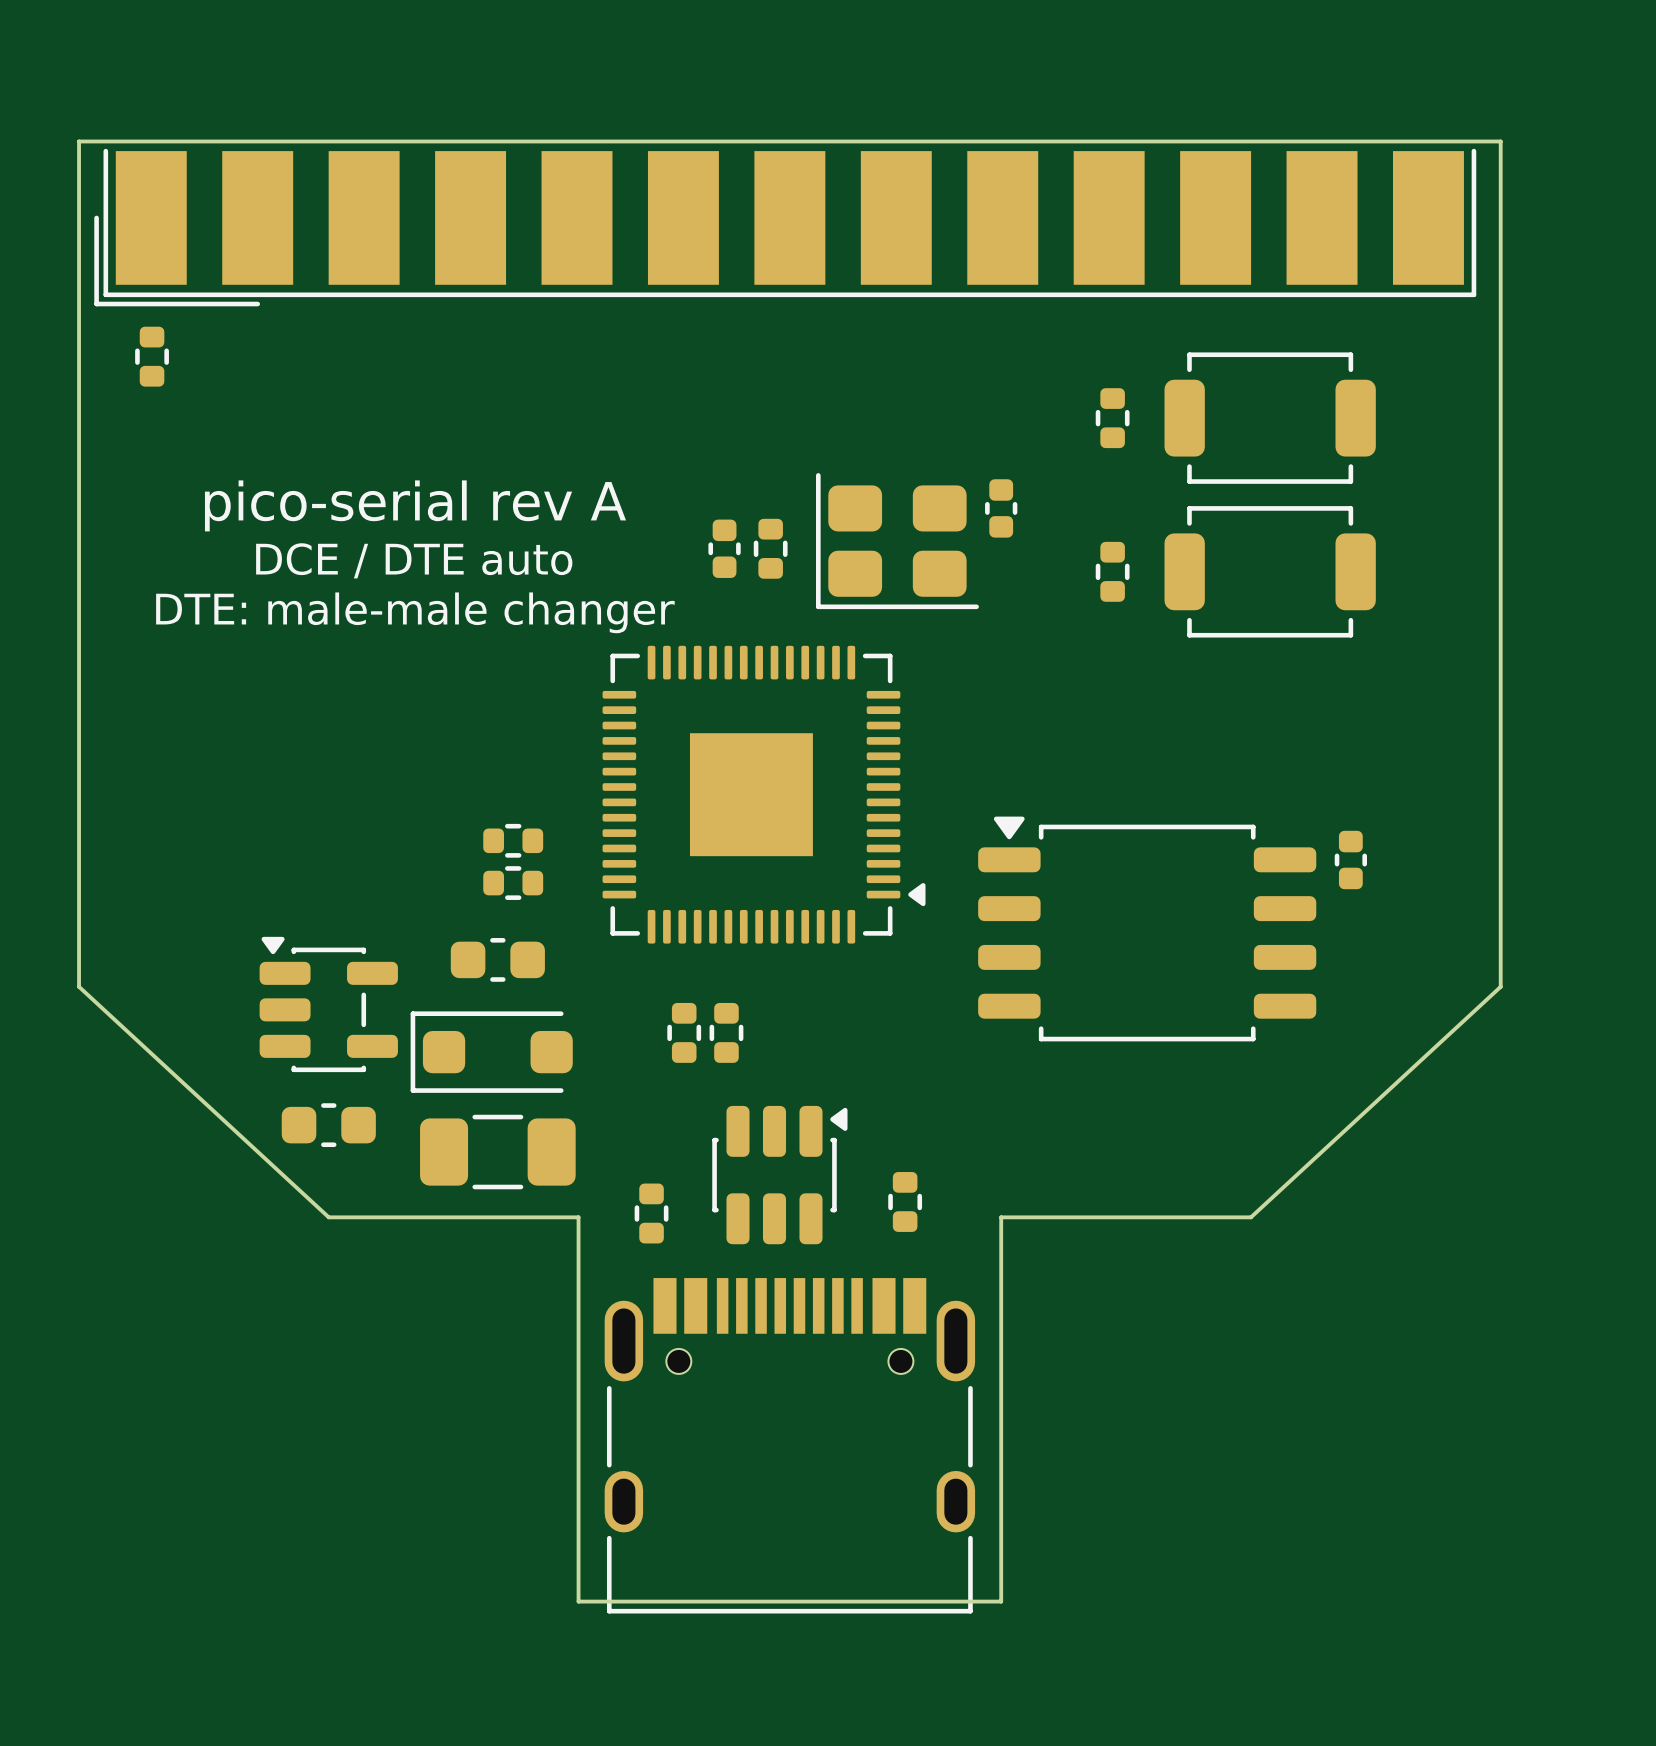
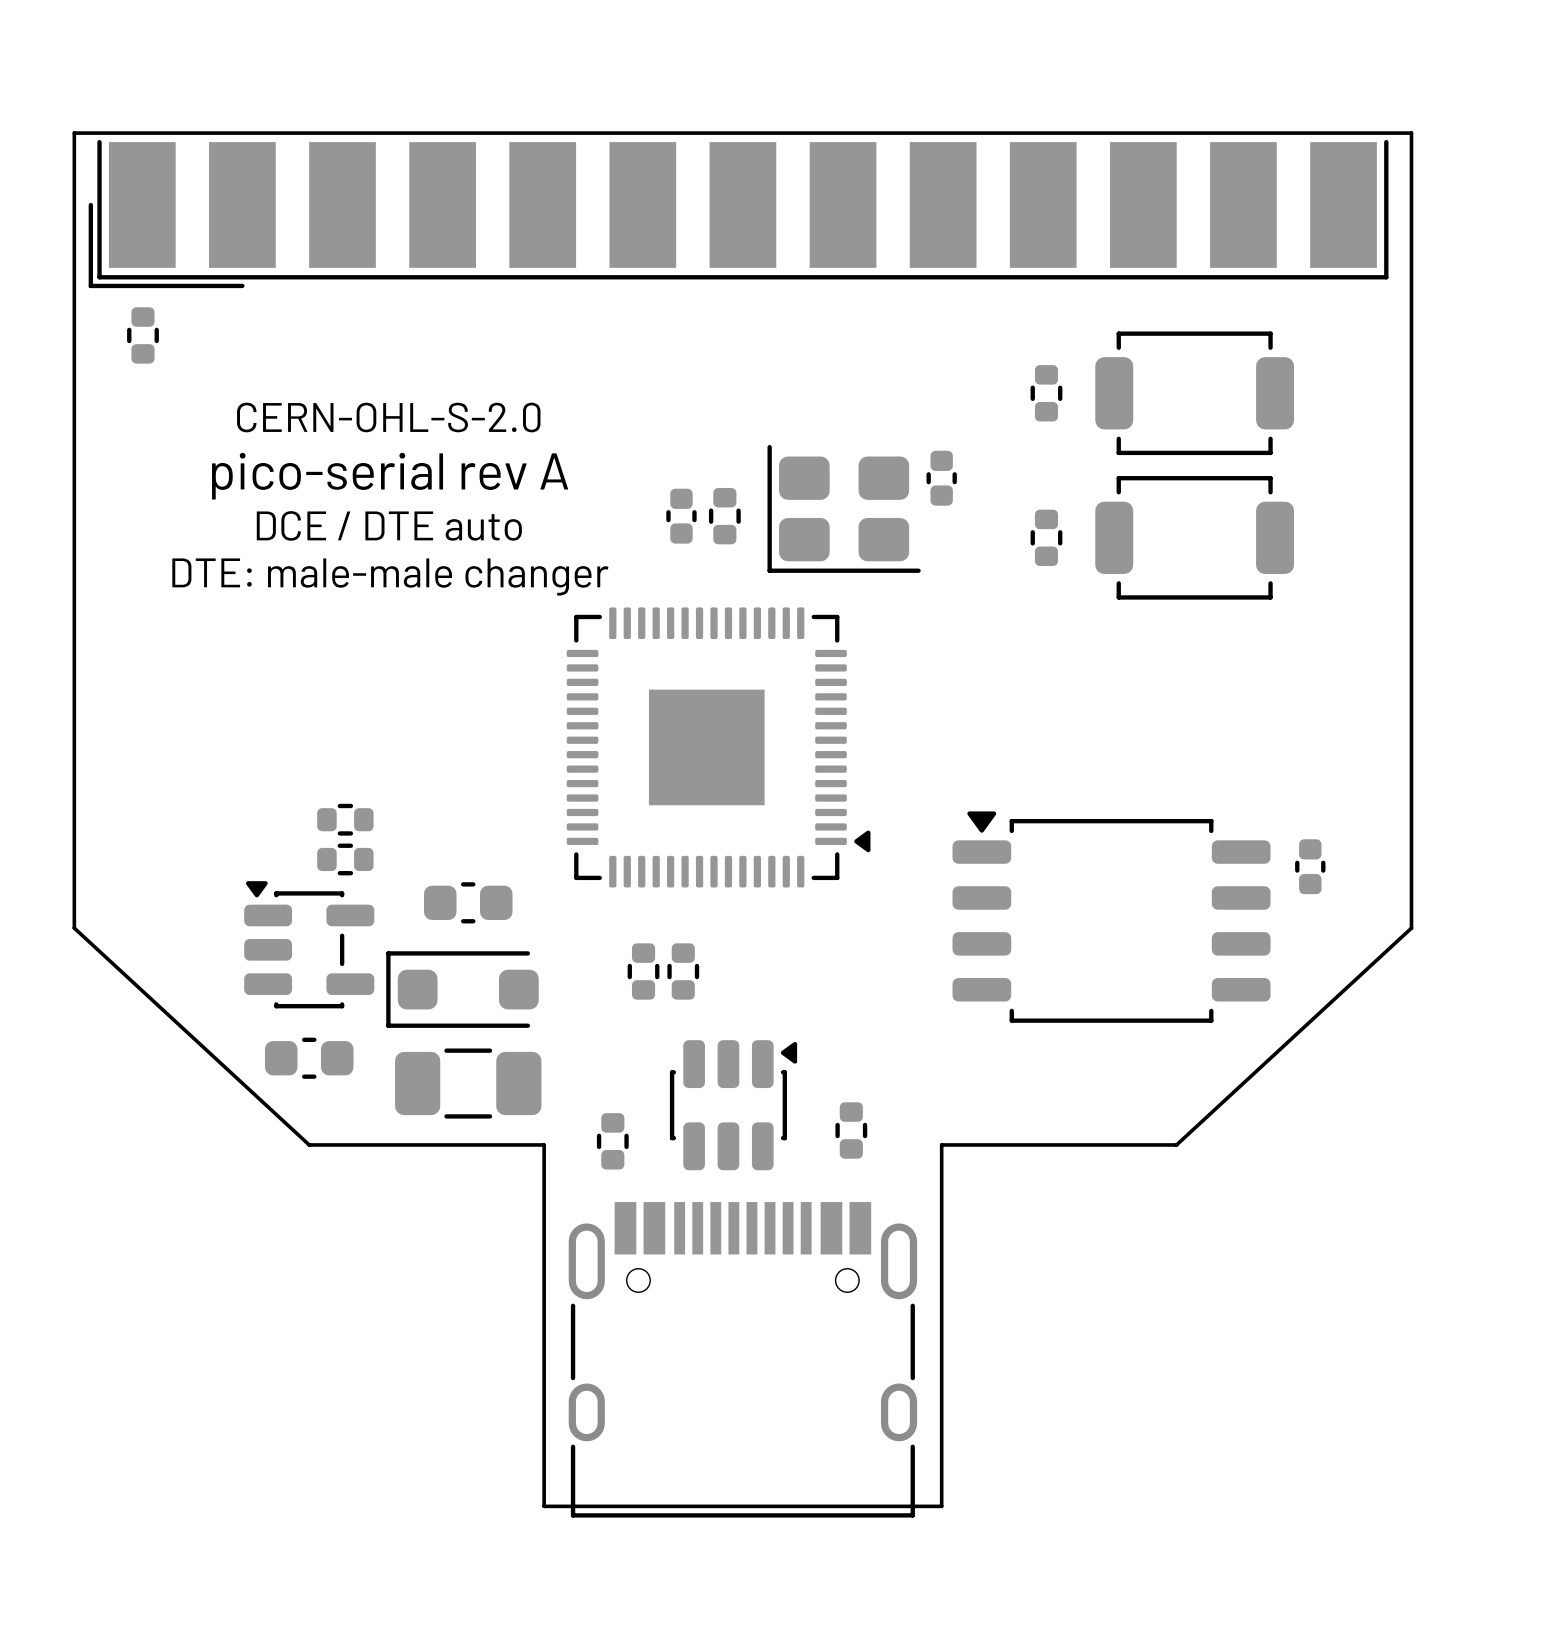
text: none -> CERN-OHL-S-2.0 (388, 417)
part: (513, 840) -> none
part position: (1350, 860) -> (1310, 866)
part: none -> (345, 819)
part: (513, 883) -> none
part: none -> (345, 859)
part position: (1147, 928) -> (1111, 917)

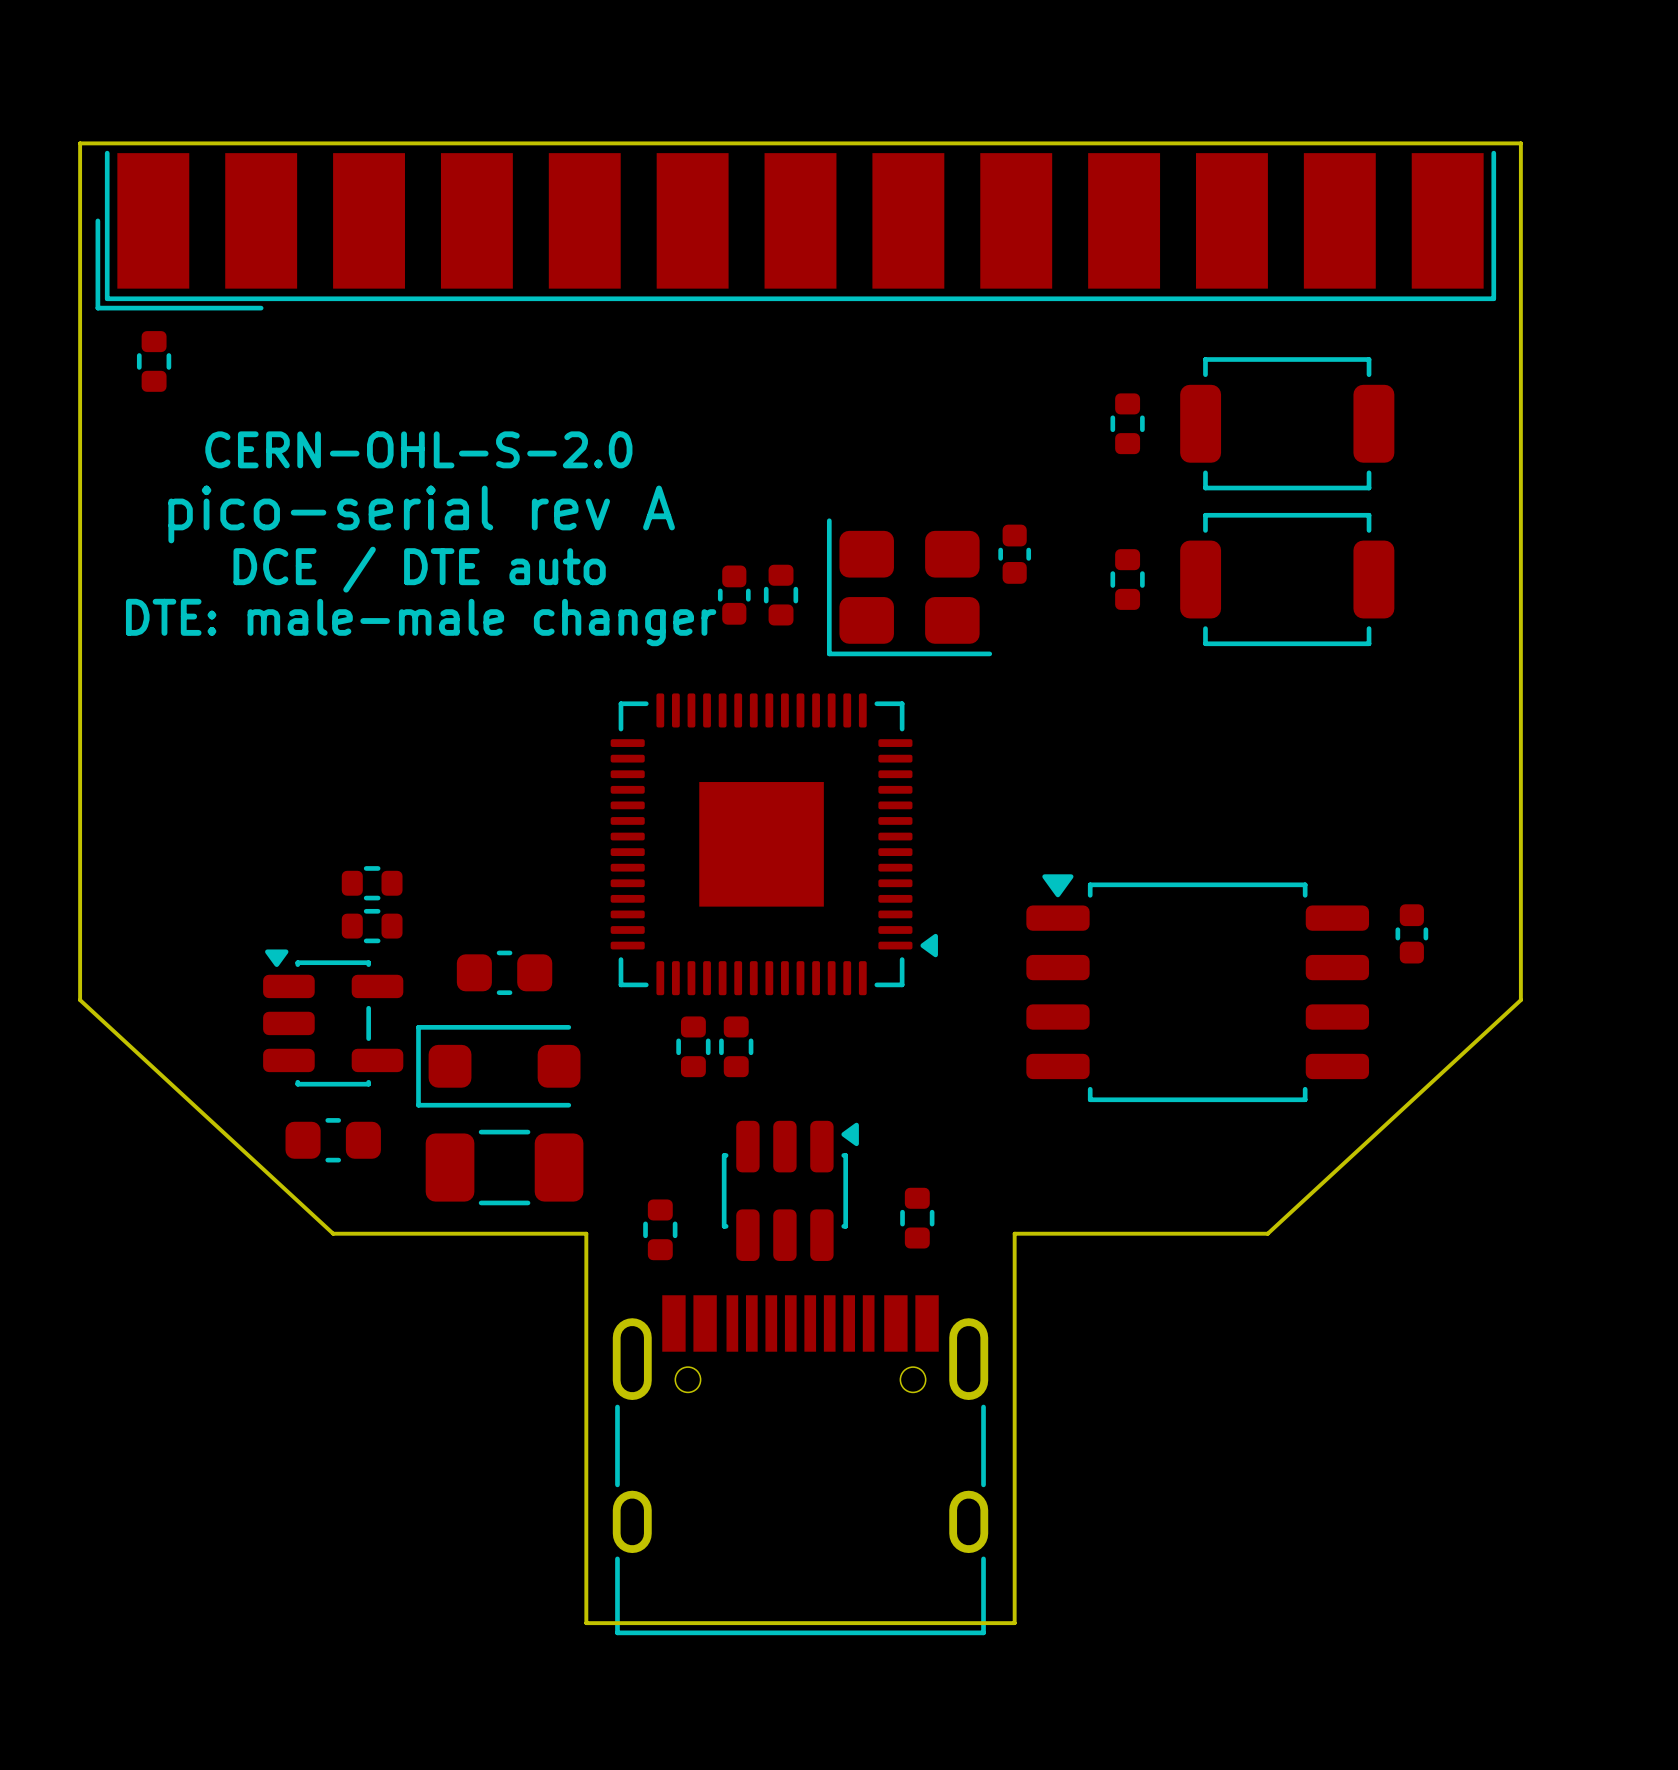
part position: (941, 478) -> (1014, 554)
part position: (844, 508) -> (909, 587)
part position: (681, 516) -> (734, 595)
part position: (724, 516) -> (781, 595)
part position: (718, 747) -> (774, 844)

